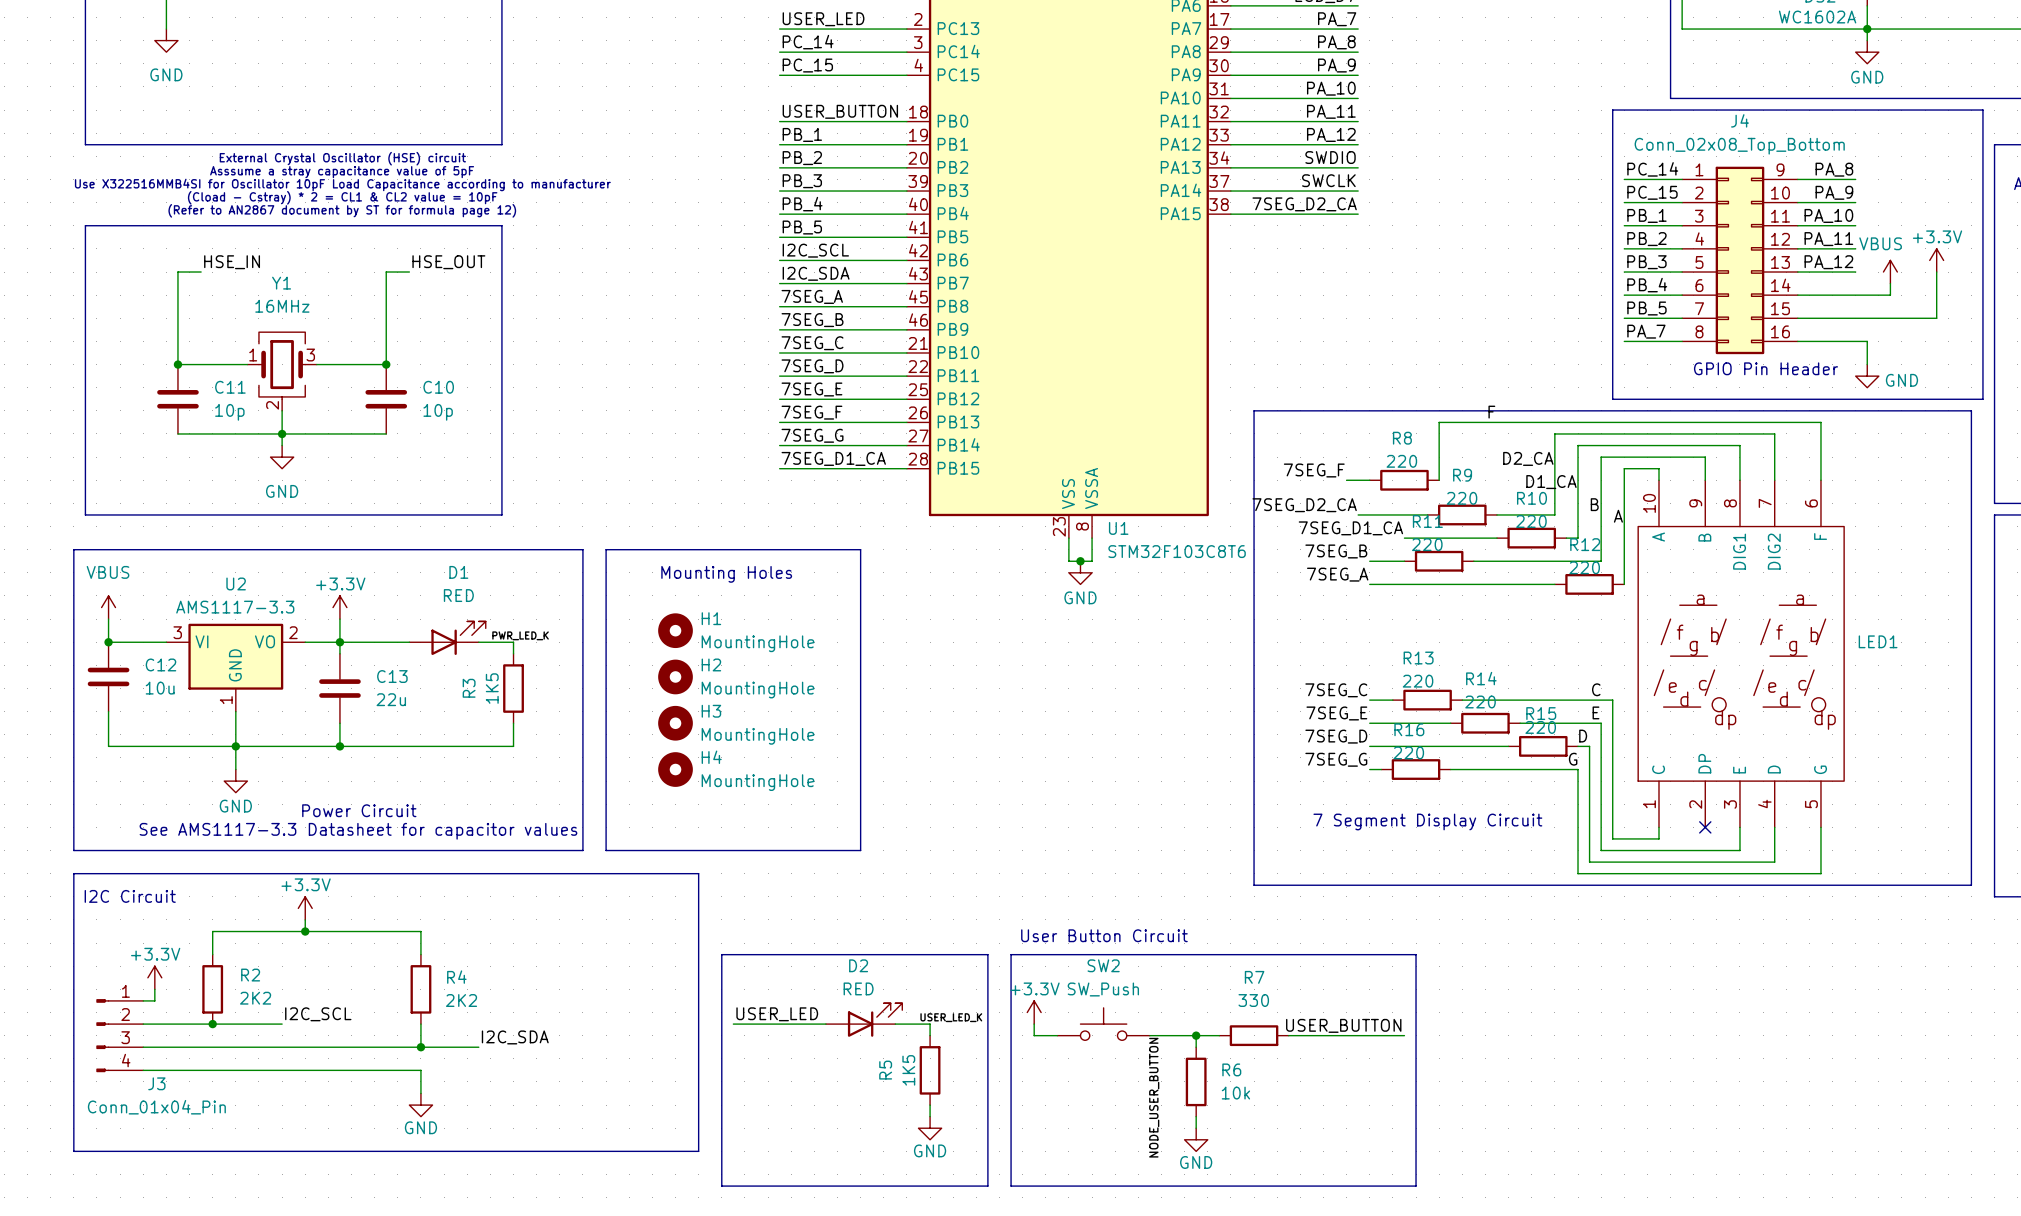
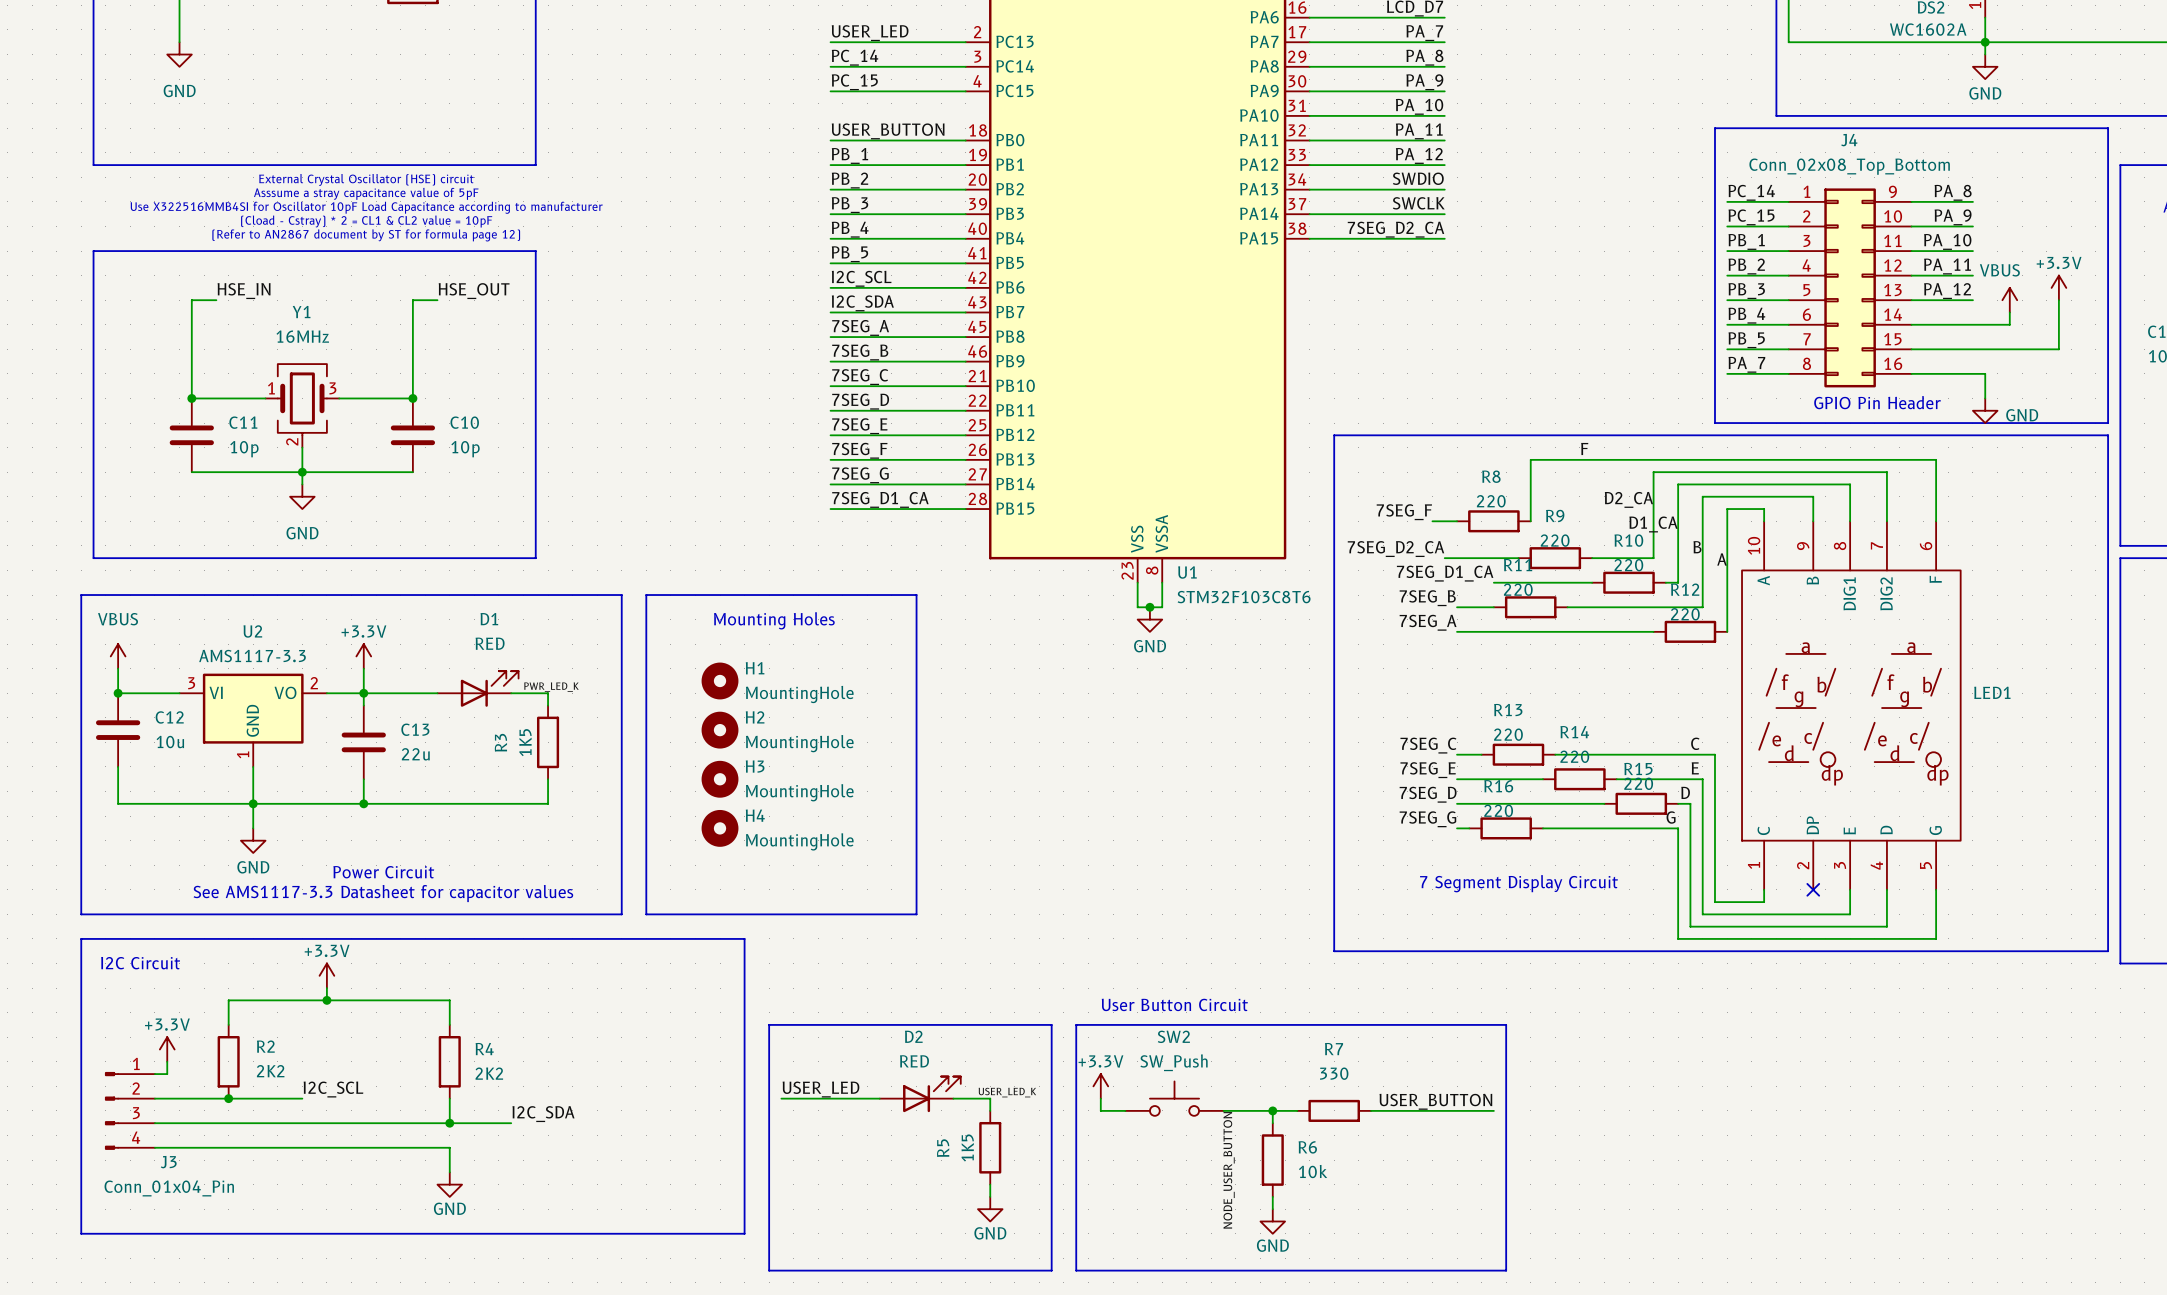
line: (1612, 387) (1612, 399) -> (1334, 447) (1334, 435) (1714, 435)
line: (1982, 387) (1982, 399) -> (2108, 423) (1714, 423)
line: (1254, 410) (1971, 410) (1971, 885) -> (2108, 435) (2108, 951) (2095, 951)

